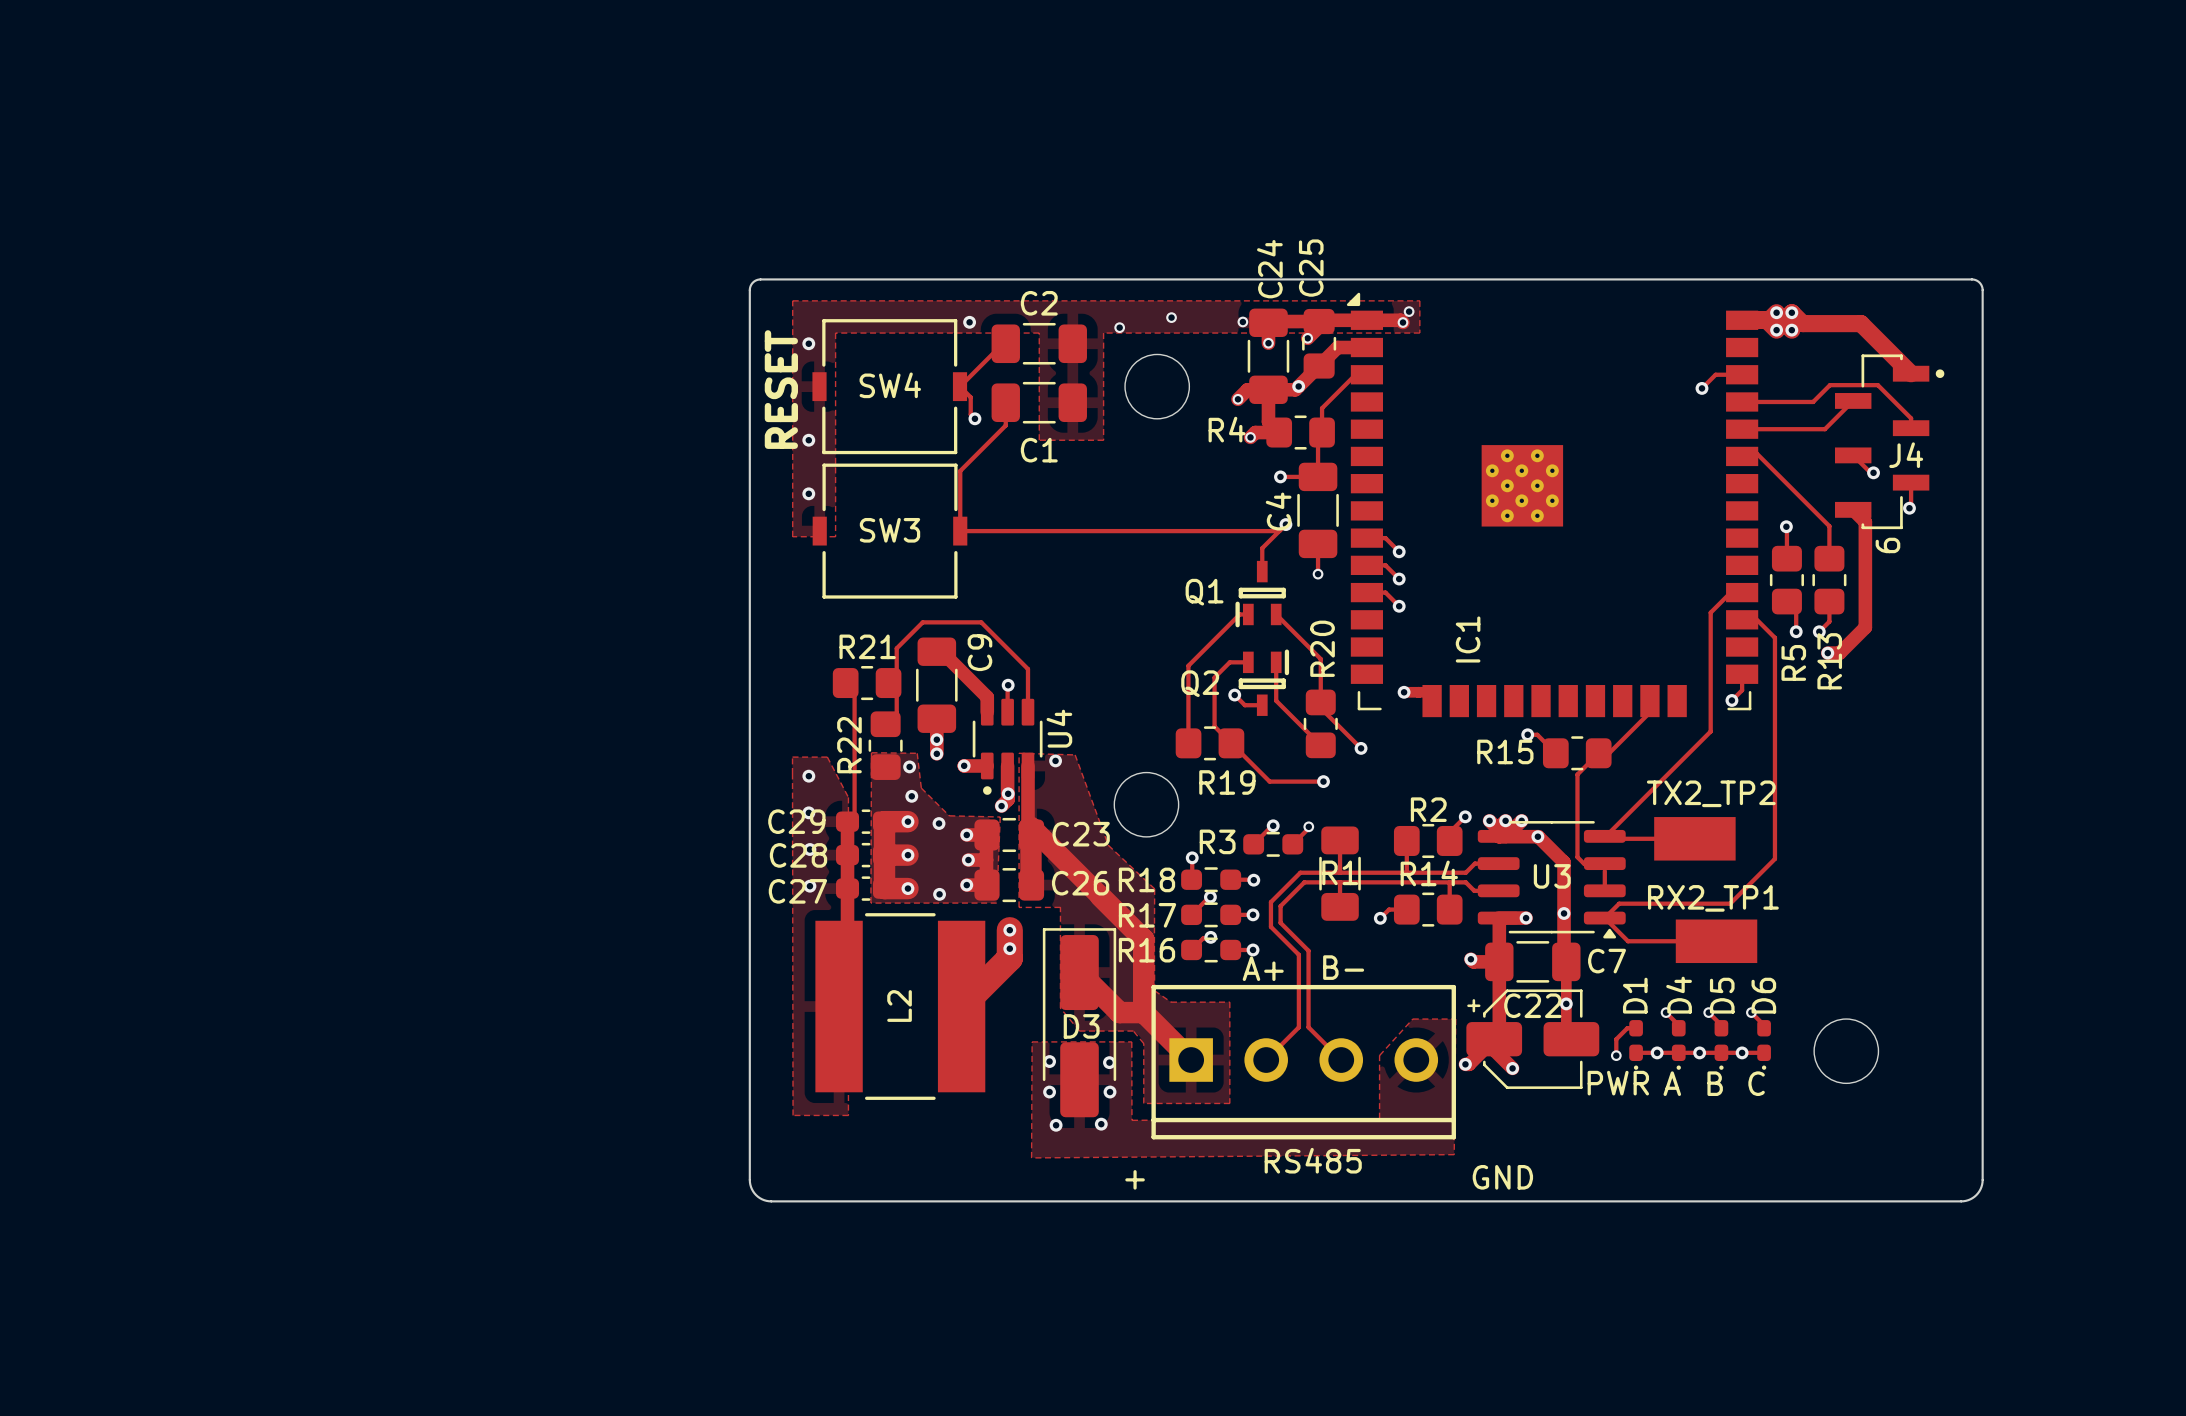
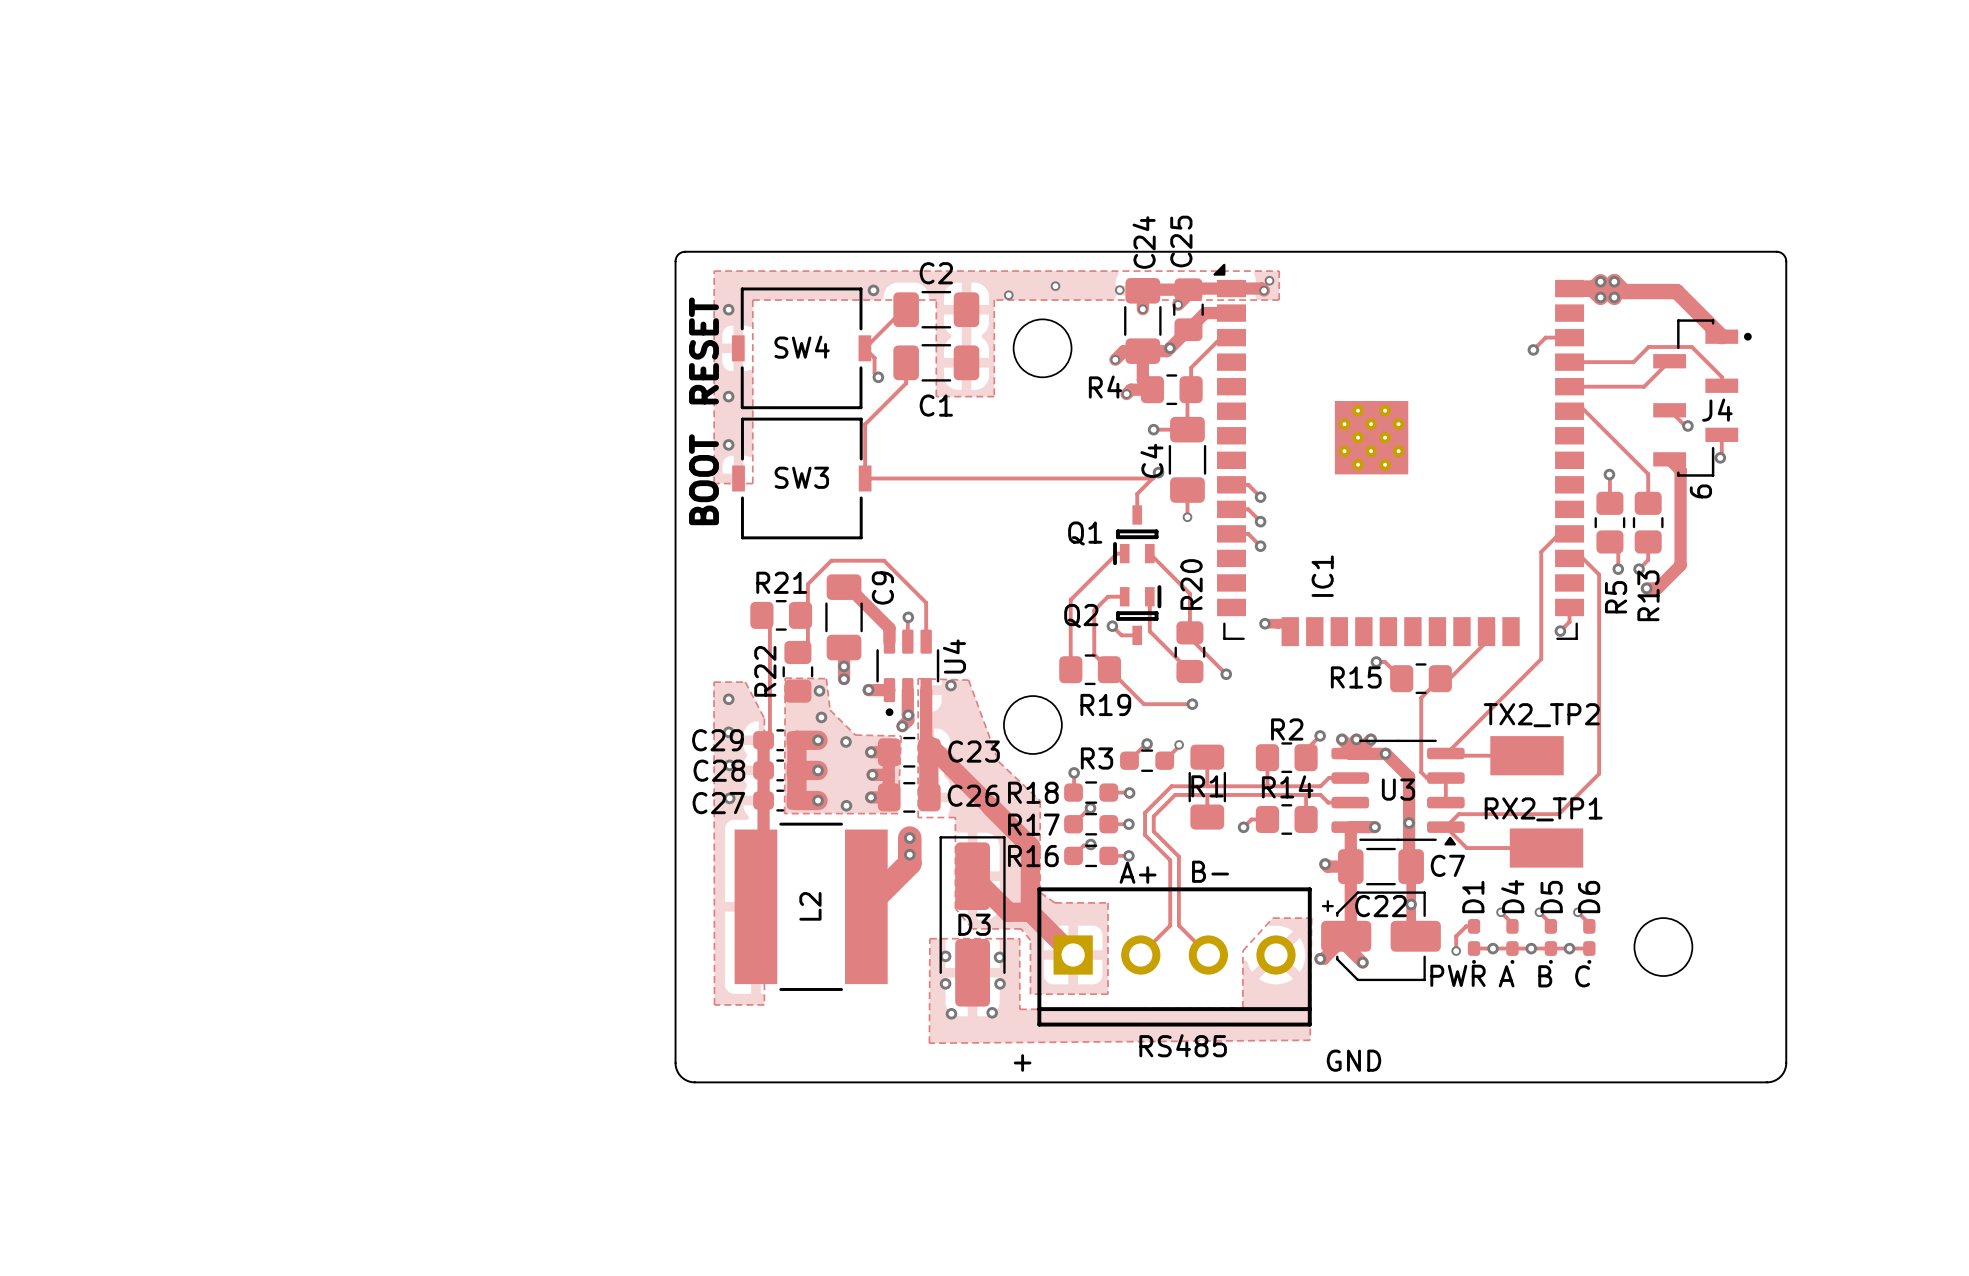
text: none -> BOOT (703, 479)

